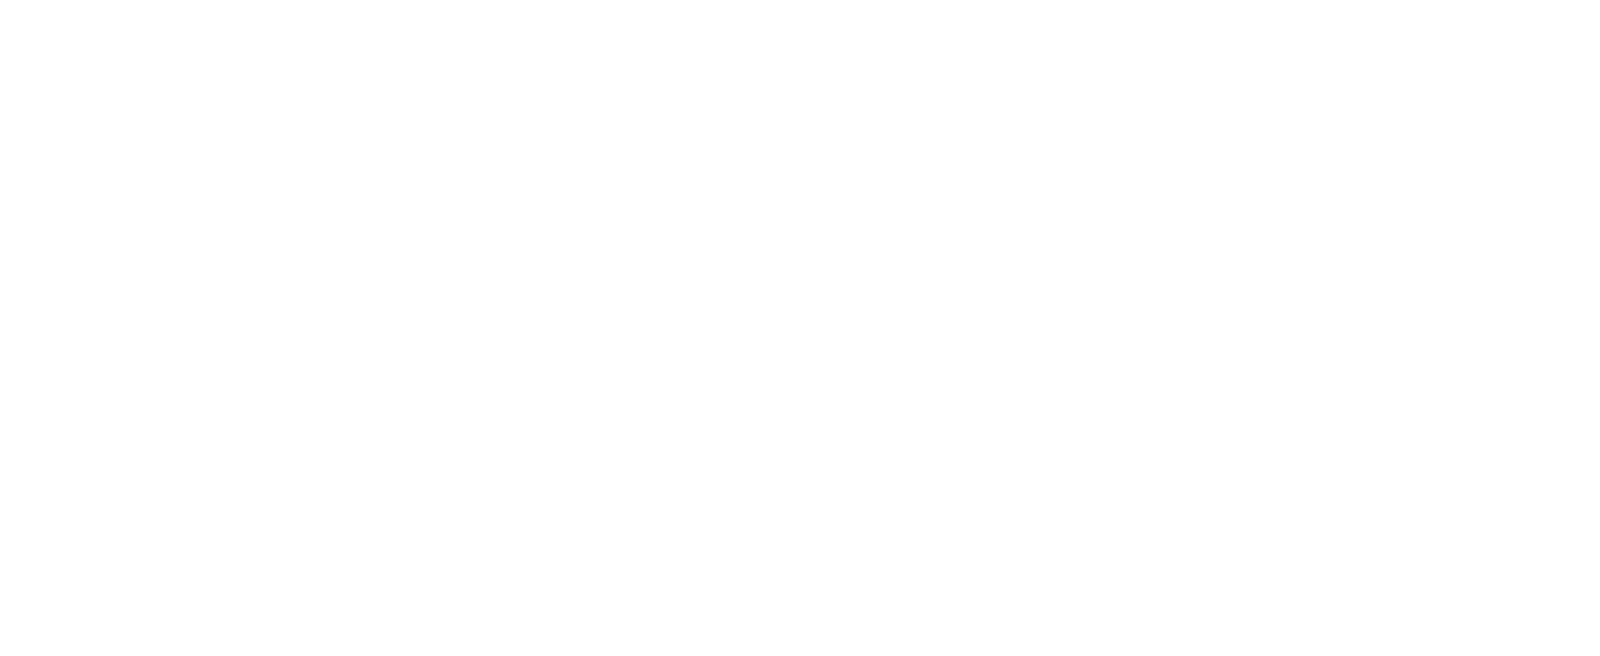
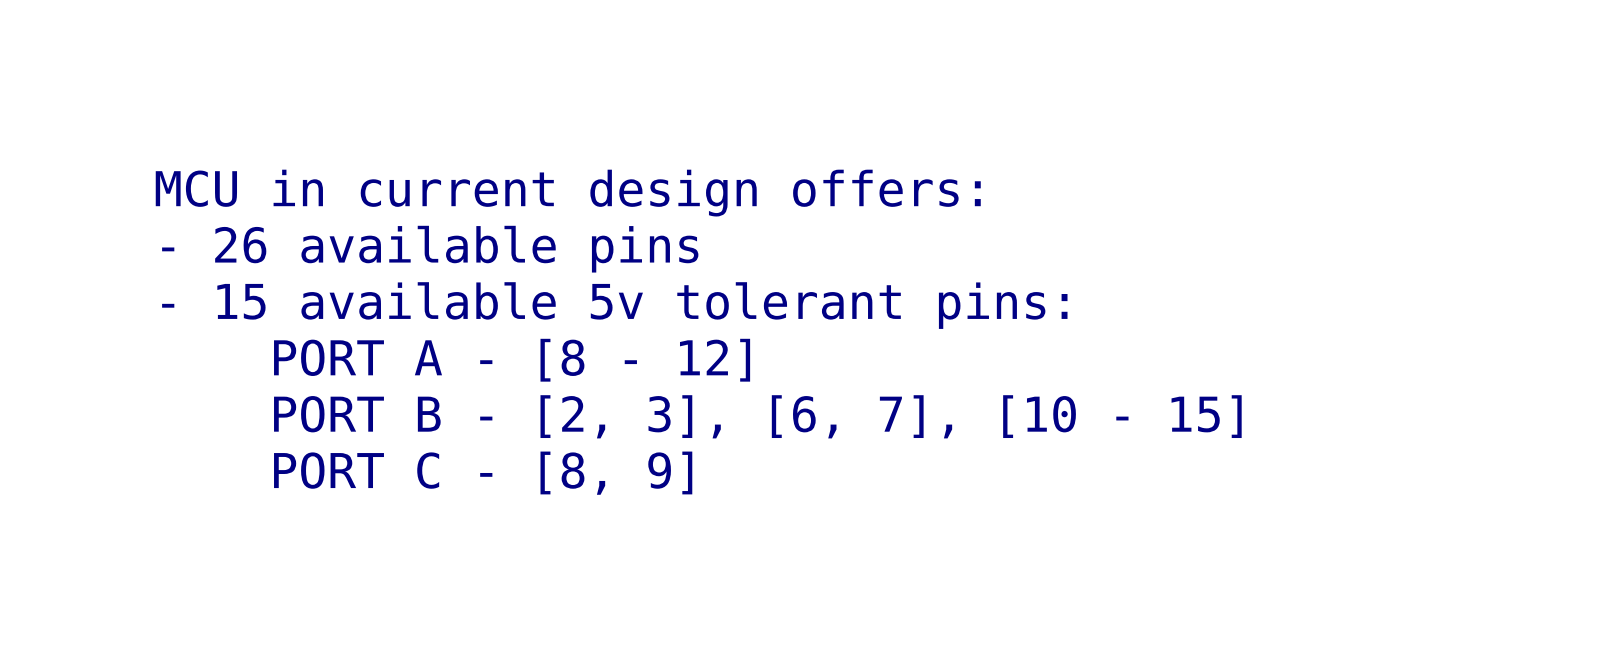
text: none -> MCU in current design offers: (568, 193)
text: none -> - 26 available pins (430, 249)
text: none -> - 15 available 5v tolerant pins: (614, 305)
text: none -> PORT A - [8 - 12] (512, 360)
text: none -> PORT B - [2, 3], [6, 7], [10 - 15] (757, 416)
text: none -> PORT C - [8, 9] (483, 473)

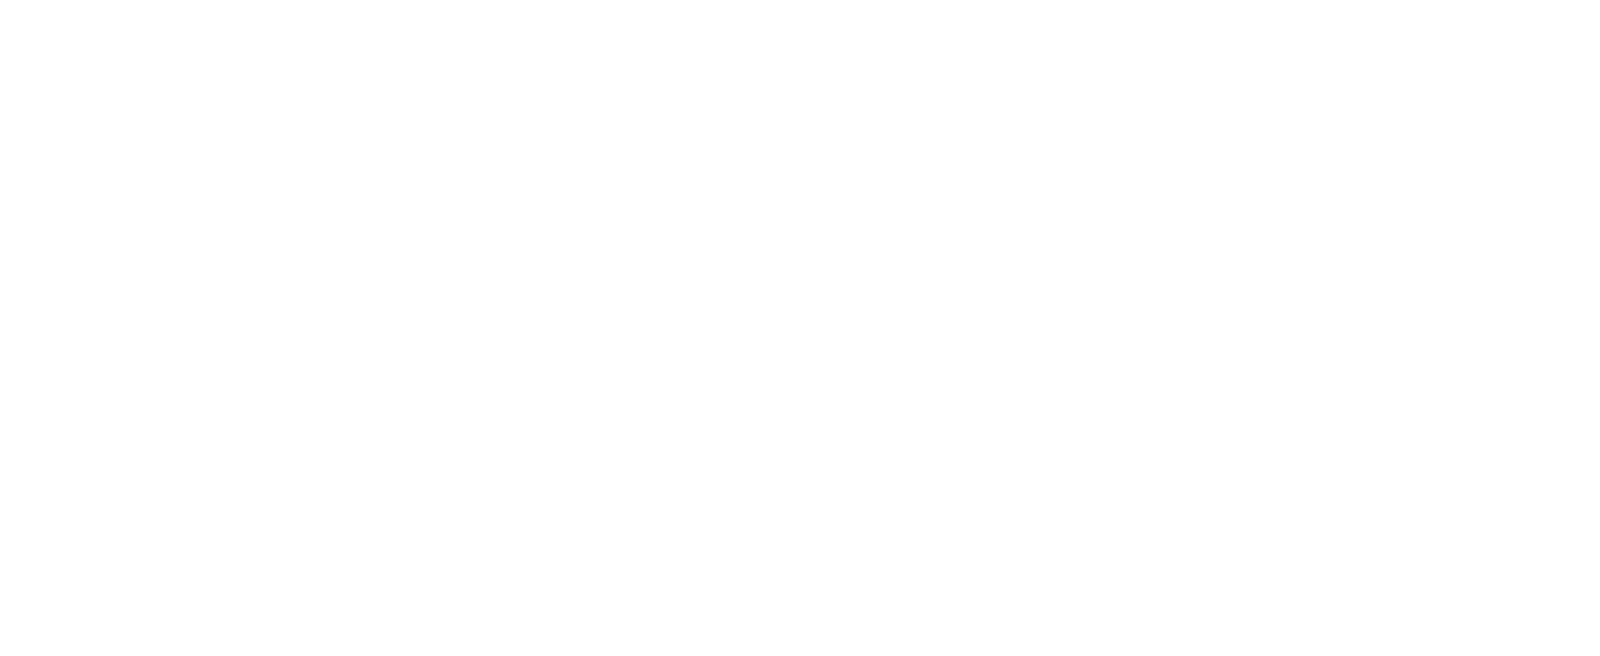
text: MCU in current design offers: (568, 193) -> none
text: - 26 available pins (430, 249) -> none
text: - 15 available 5v tolerant pins: (614, 305) -> none
text: PORT A - [8 - 12] (512, 360) -> none
text: PORT B - [2, 3], [6, 7], [10 - 15] (757, 416) -> none
text: PORT C - [8, 9] (483, 473) -> none

